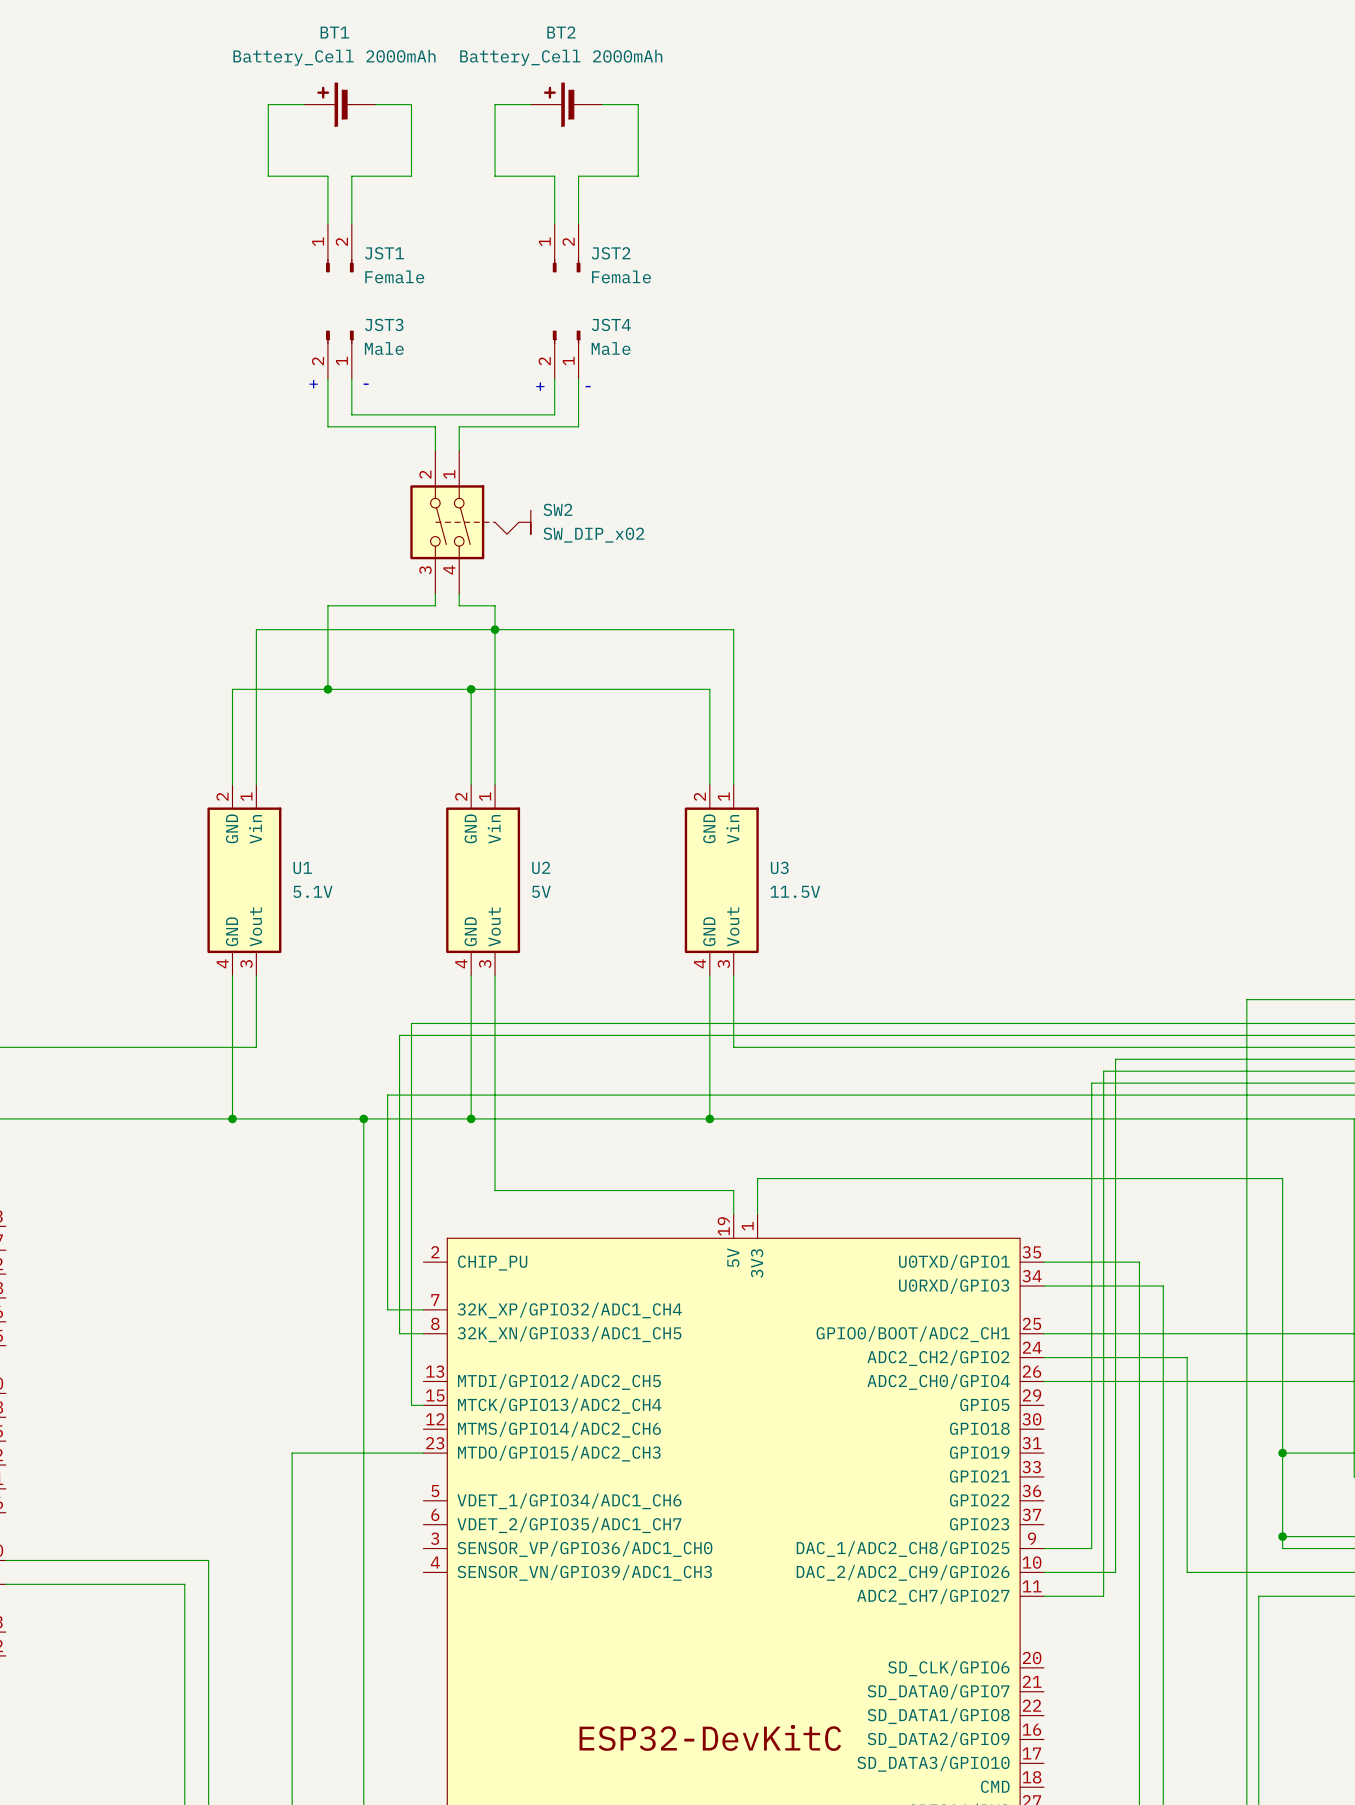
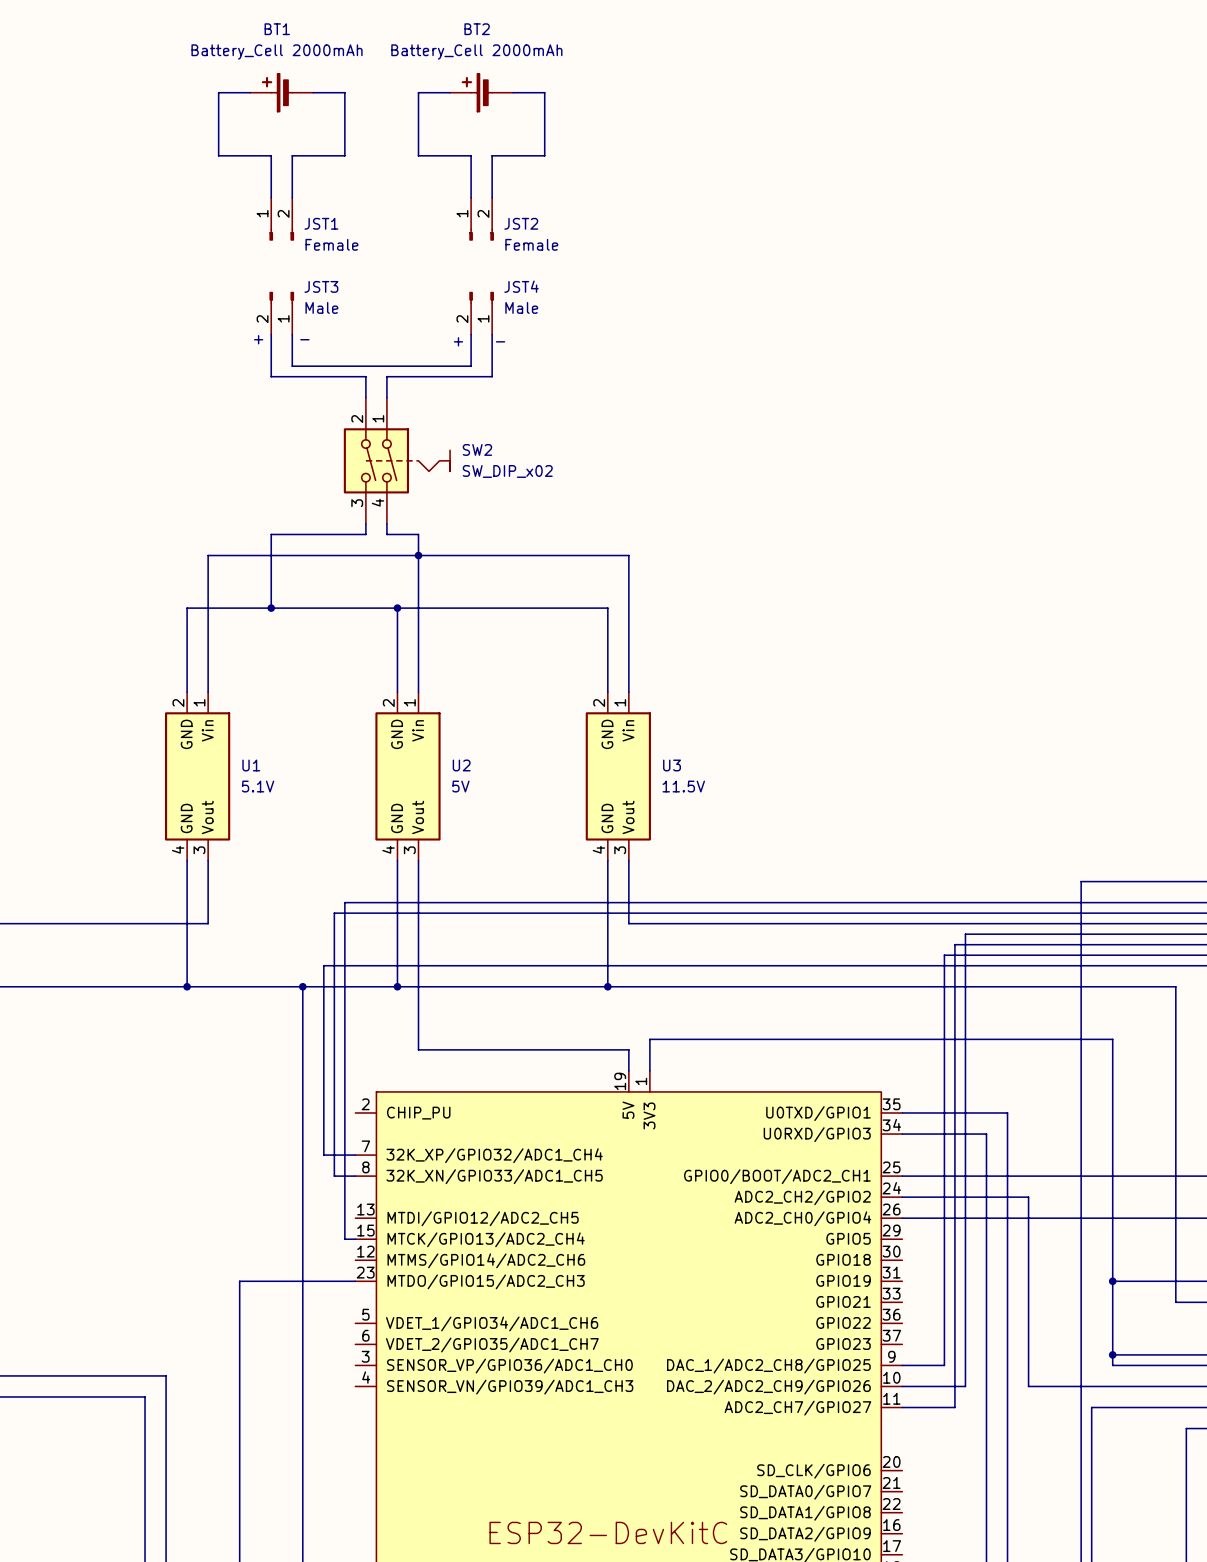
wire: (1139, 1262) (1139, 1286) (1163, 1286) -> (986, 1112) (1007, 1112) (1007, 1134)

